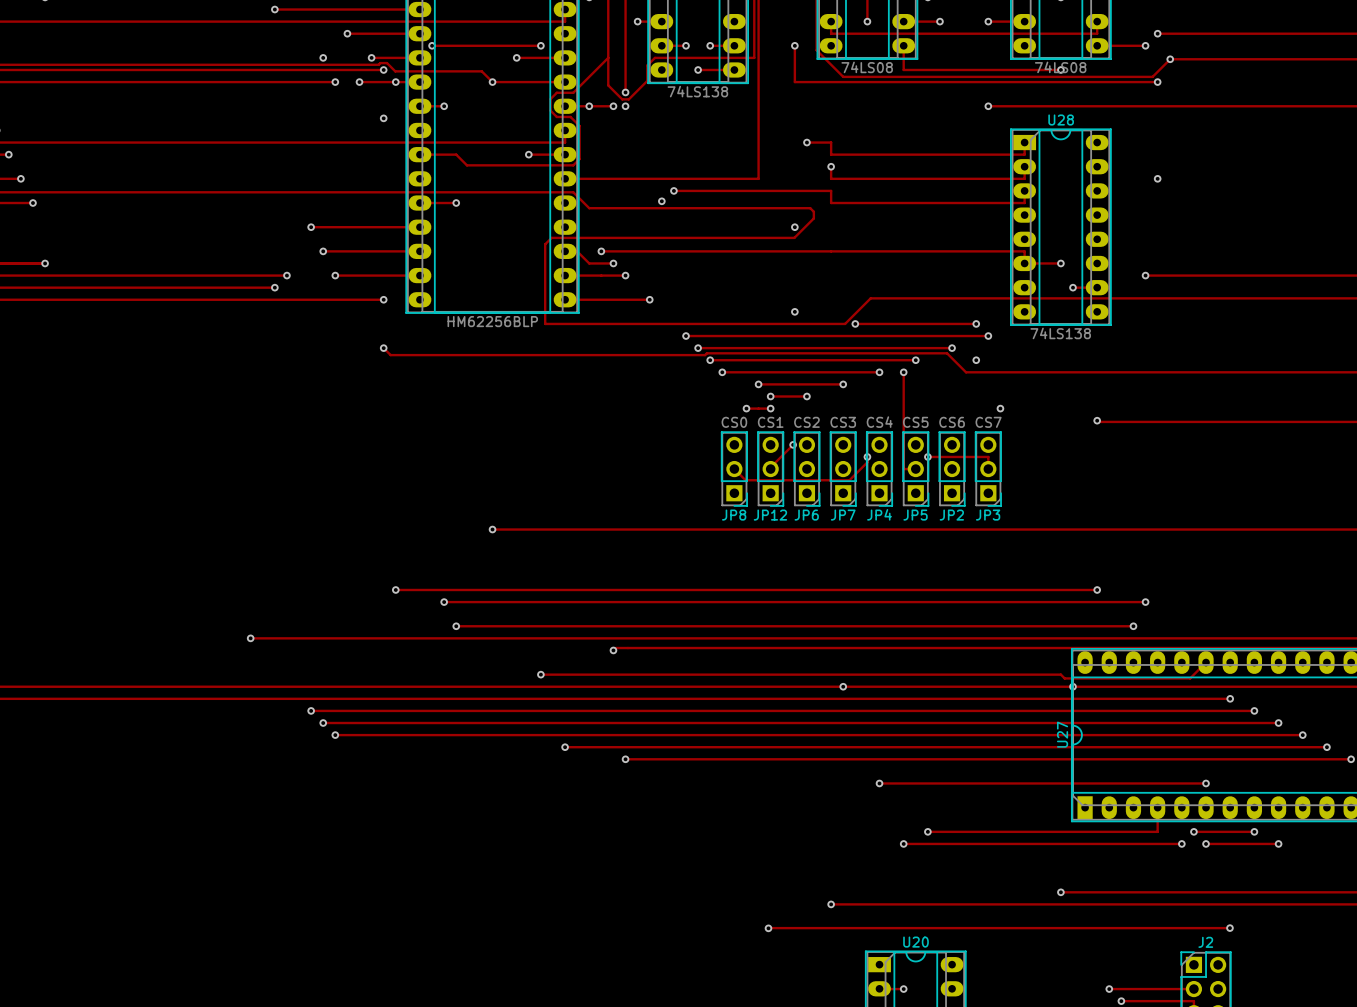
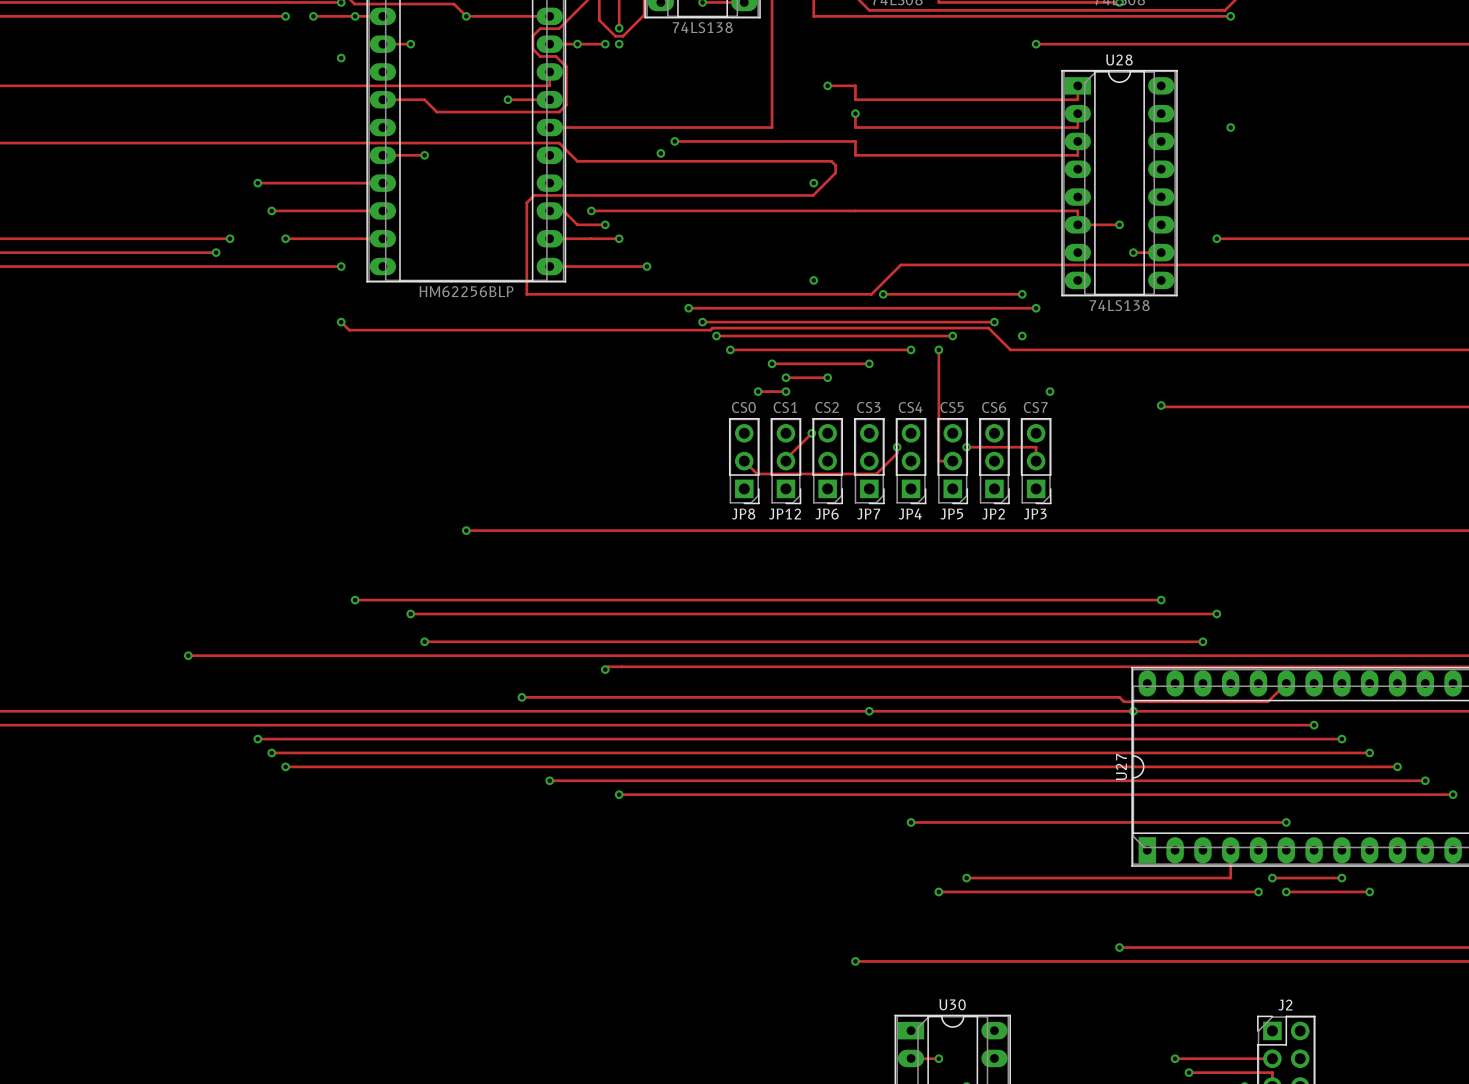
via: (768, 928) -> none
track: (1229, 928) (768, 928) -> none
via: (1229, 928) -> none
U20 name: U20 (916, 942) -> U30 (952, 1004)

